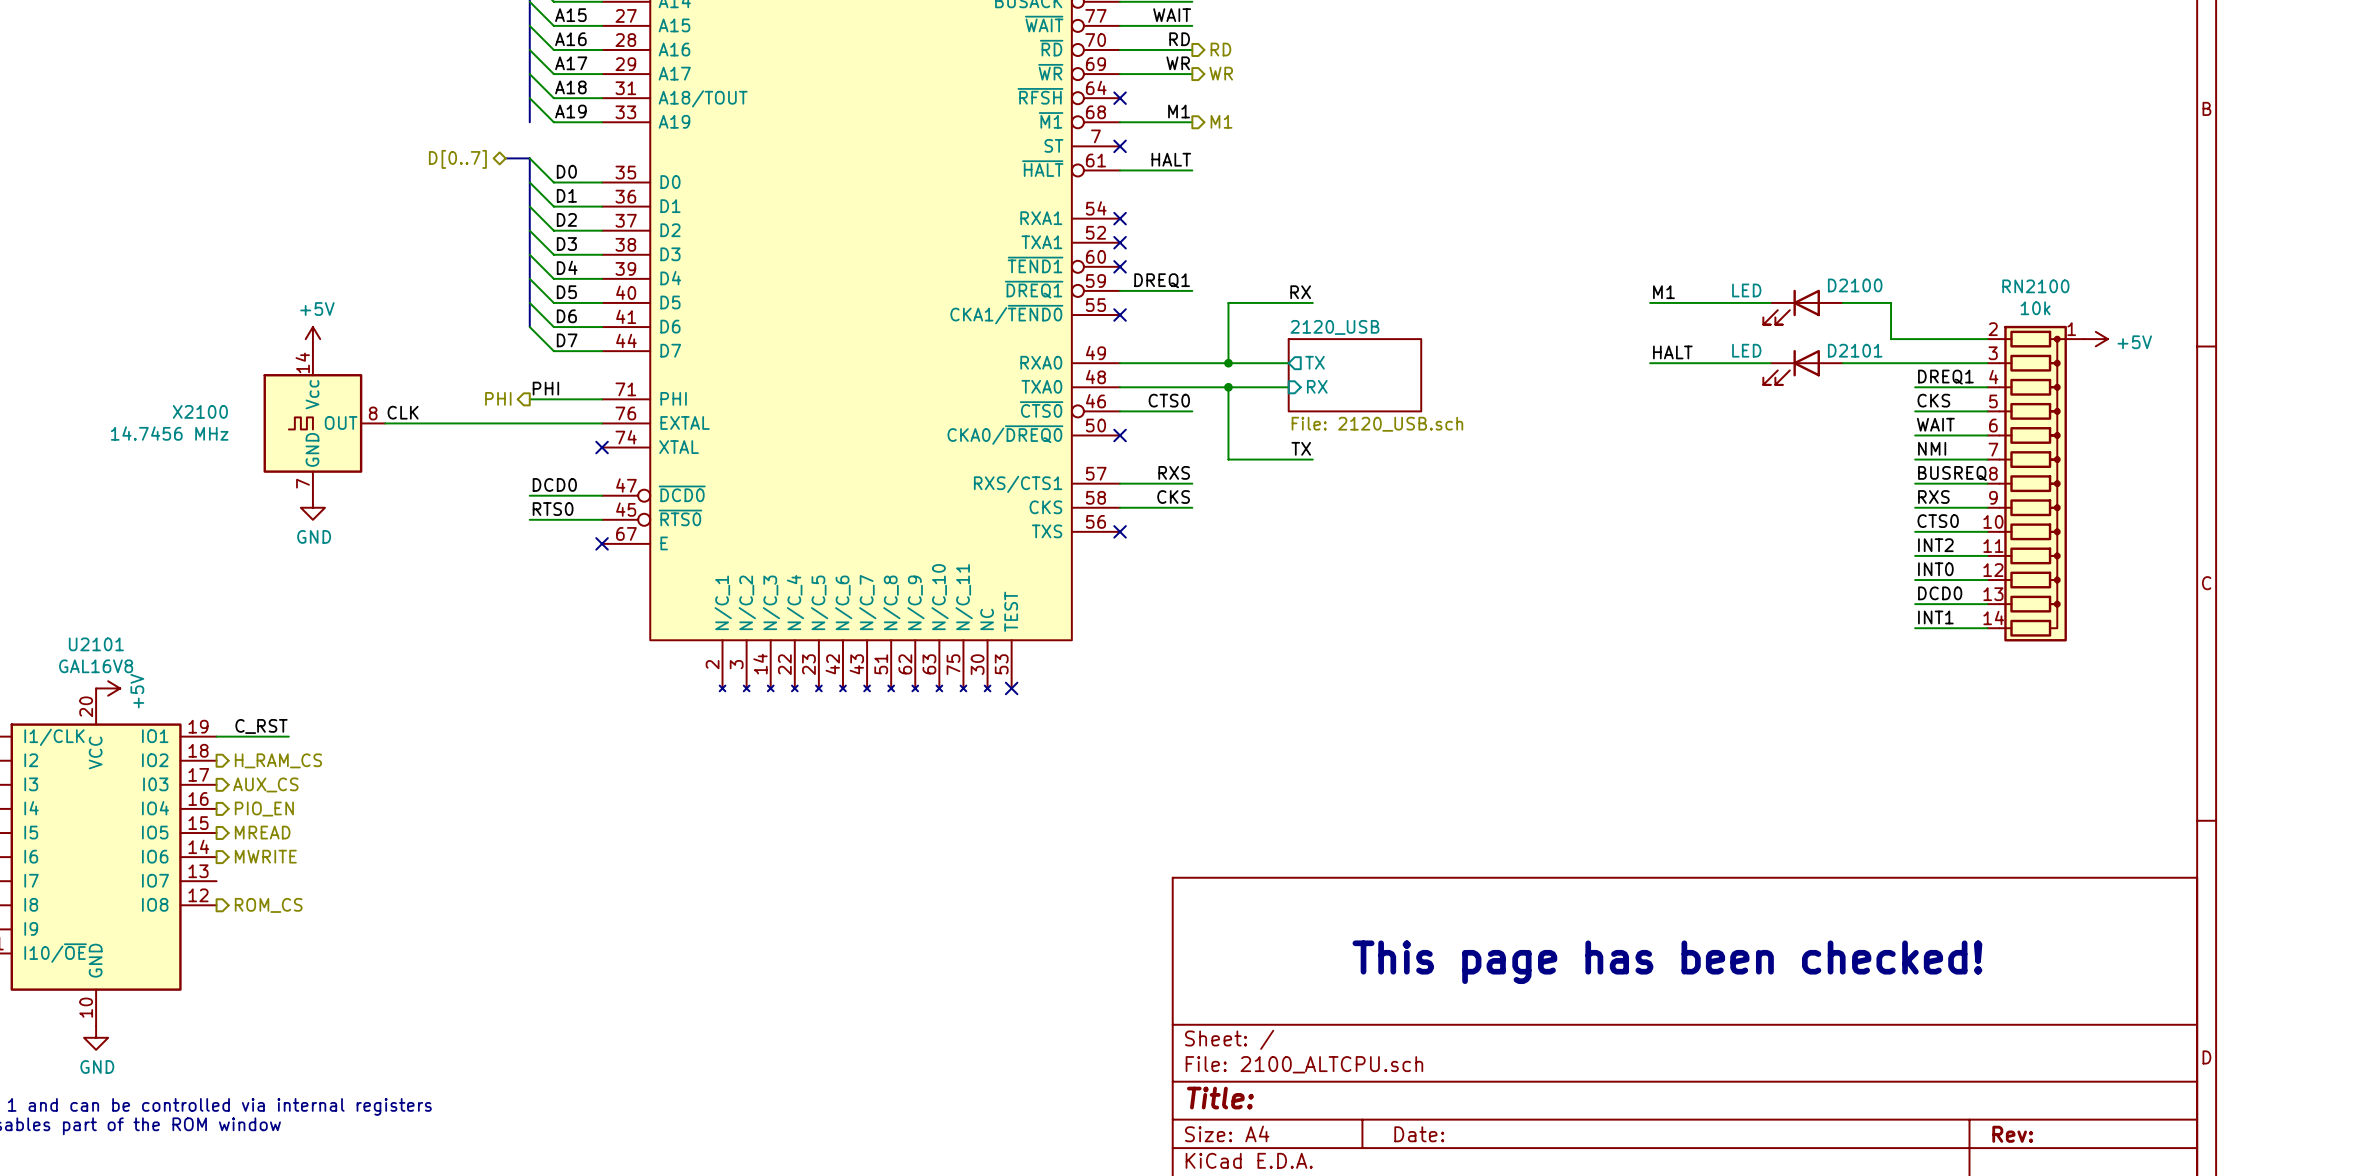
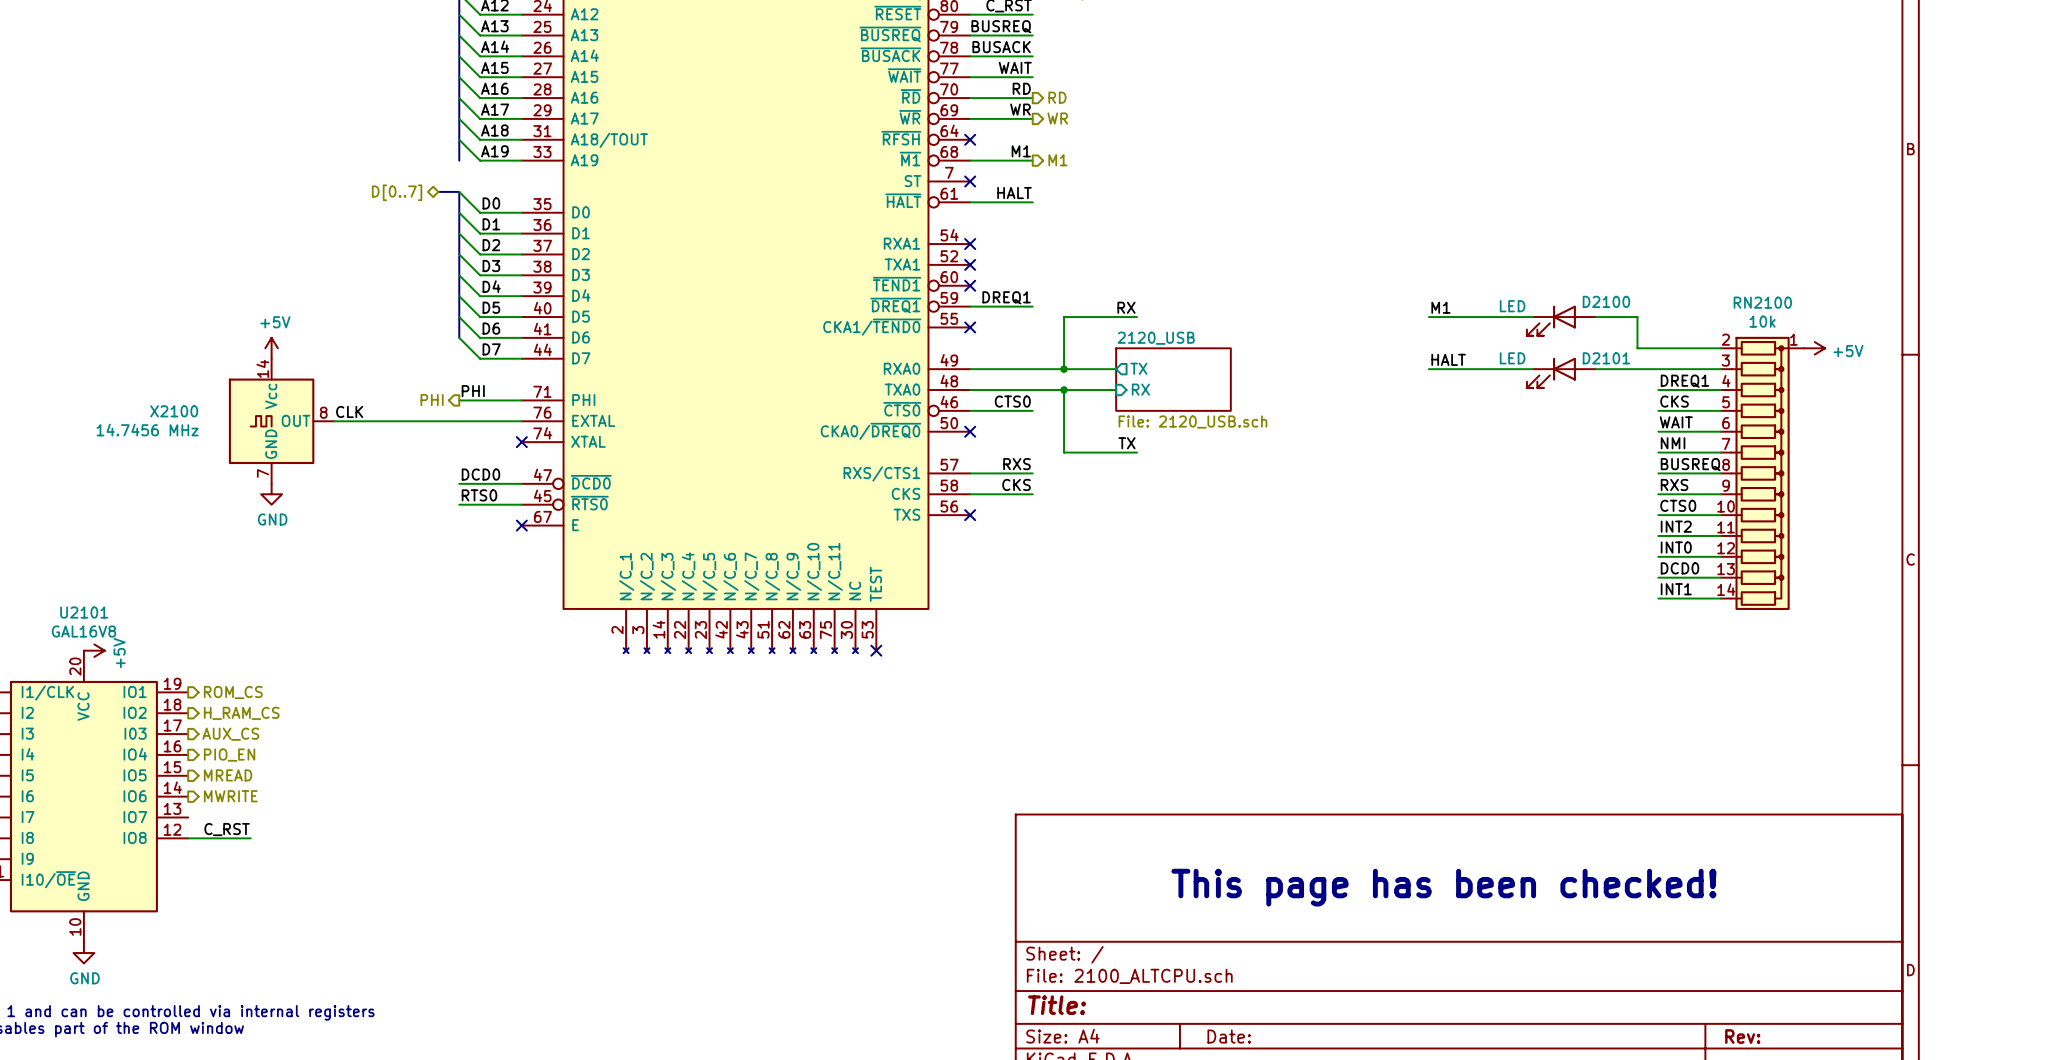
label position: C_RST (261, 726) -> C_RST (227, 829)
wire: (216, 736) (288, 736) -> (188, 838) (250, 838)
hierarchical label position: ROM_CS (268, 905) -> ROM_CS (233, 692)

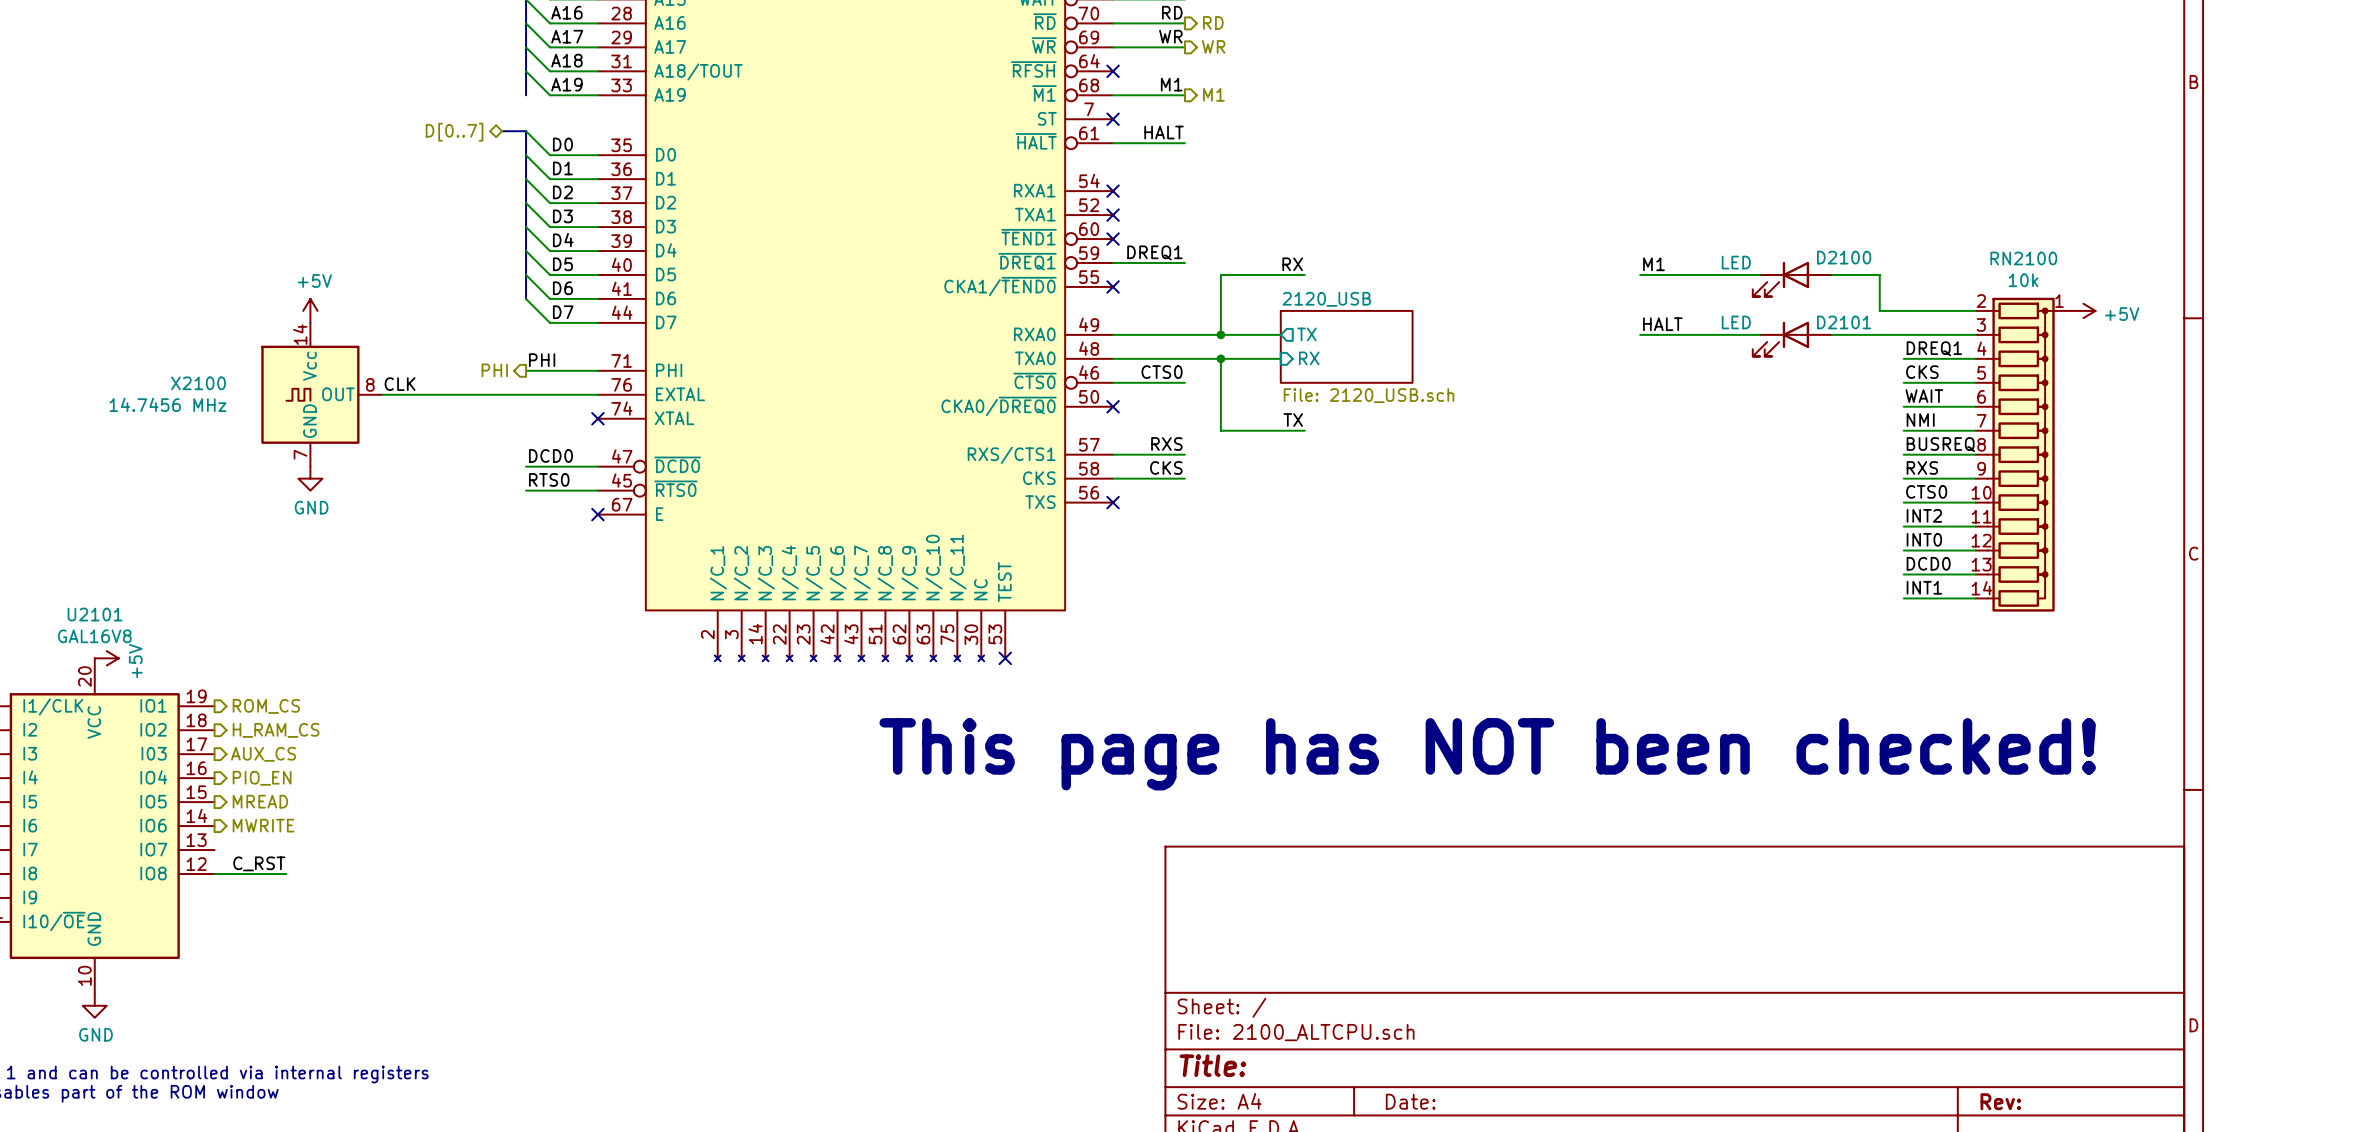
text: none -> This page has NOT been checked! (1487, 754)
text: This page has been checked! (1443, 887) -> none

